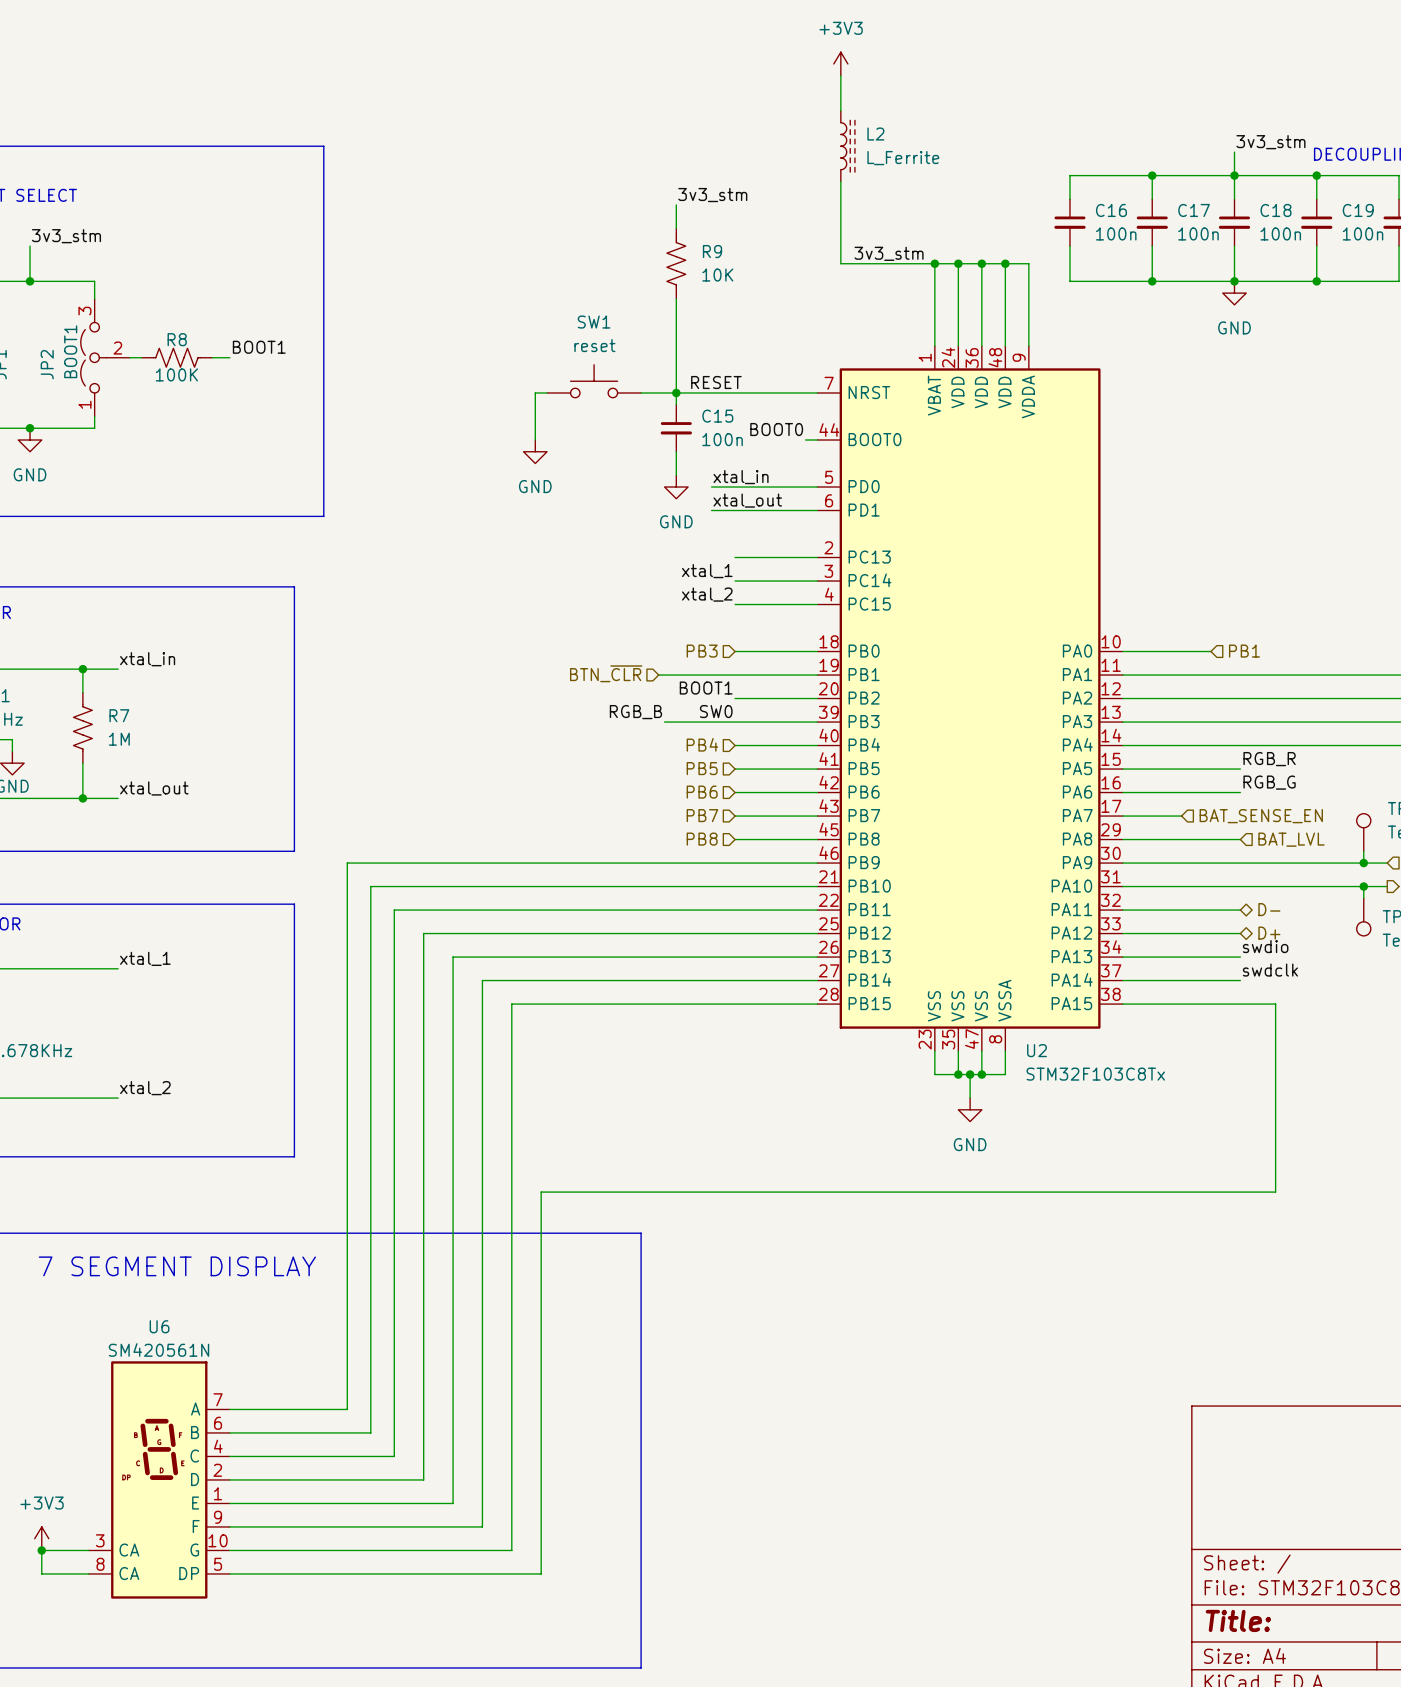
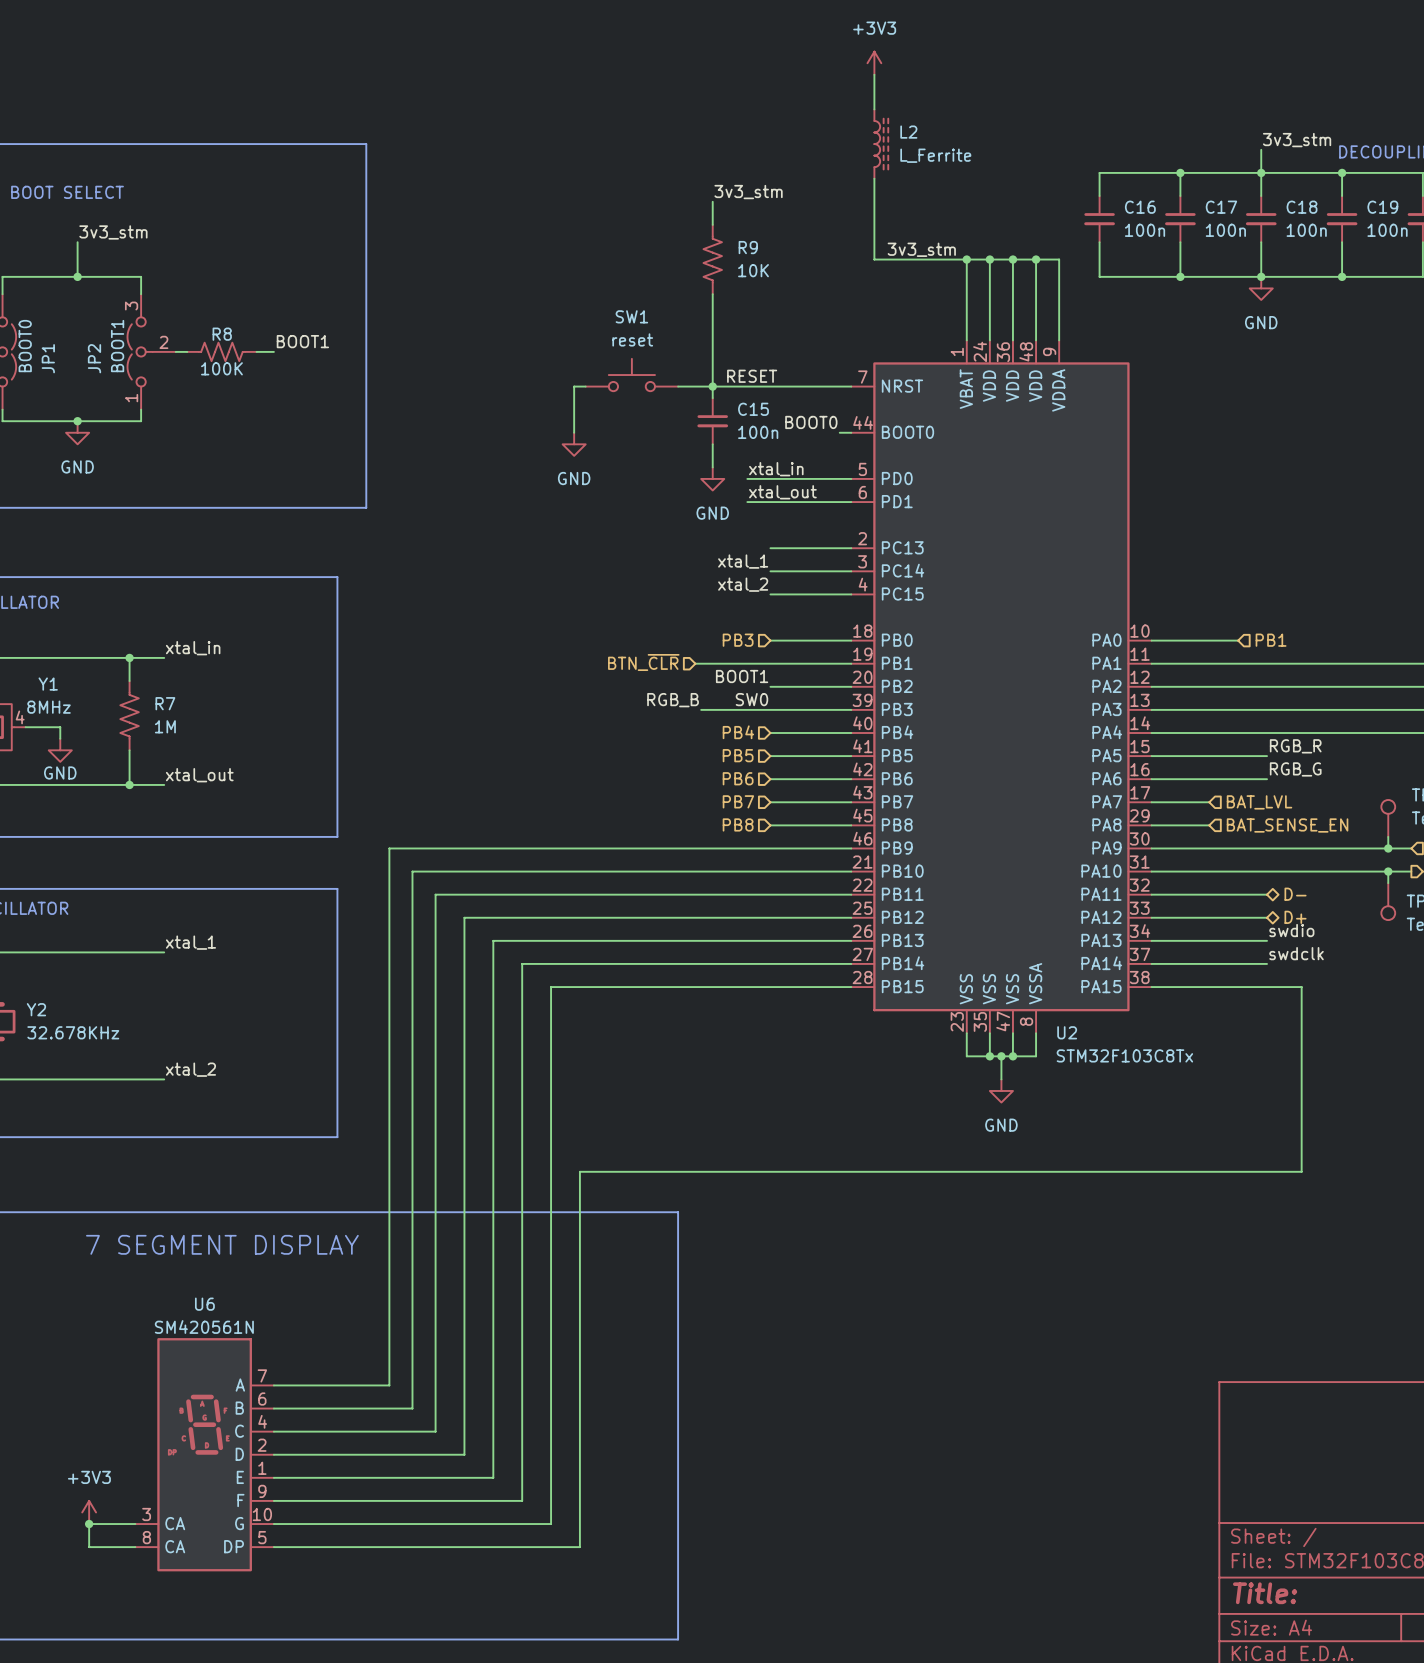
hierarchical label: BAT_SENSE_EN (1261, 816) -> BAT_LVL (1259, 802)
wire: (1181, 839) (1240, 839) -> none
hierarchical label: none -> BAT_SENSE_EN (1287, 825)
hierarchical label: BAT_LVL (1291, 839) -> none

